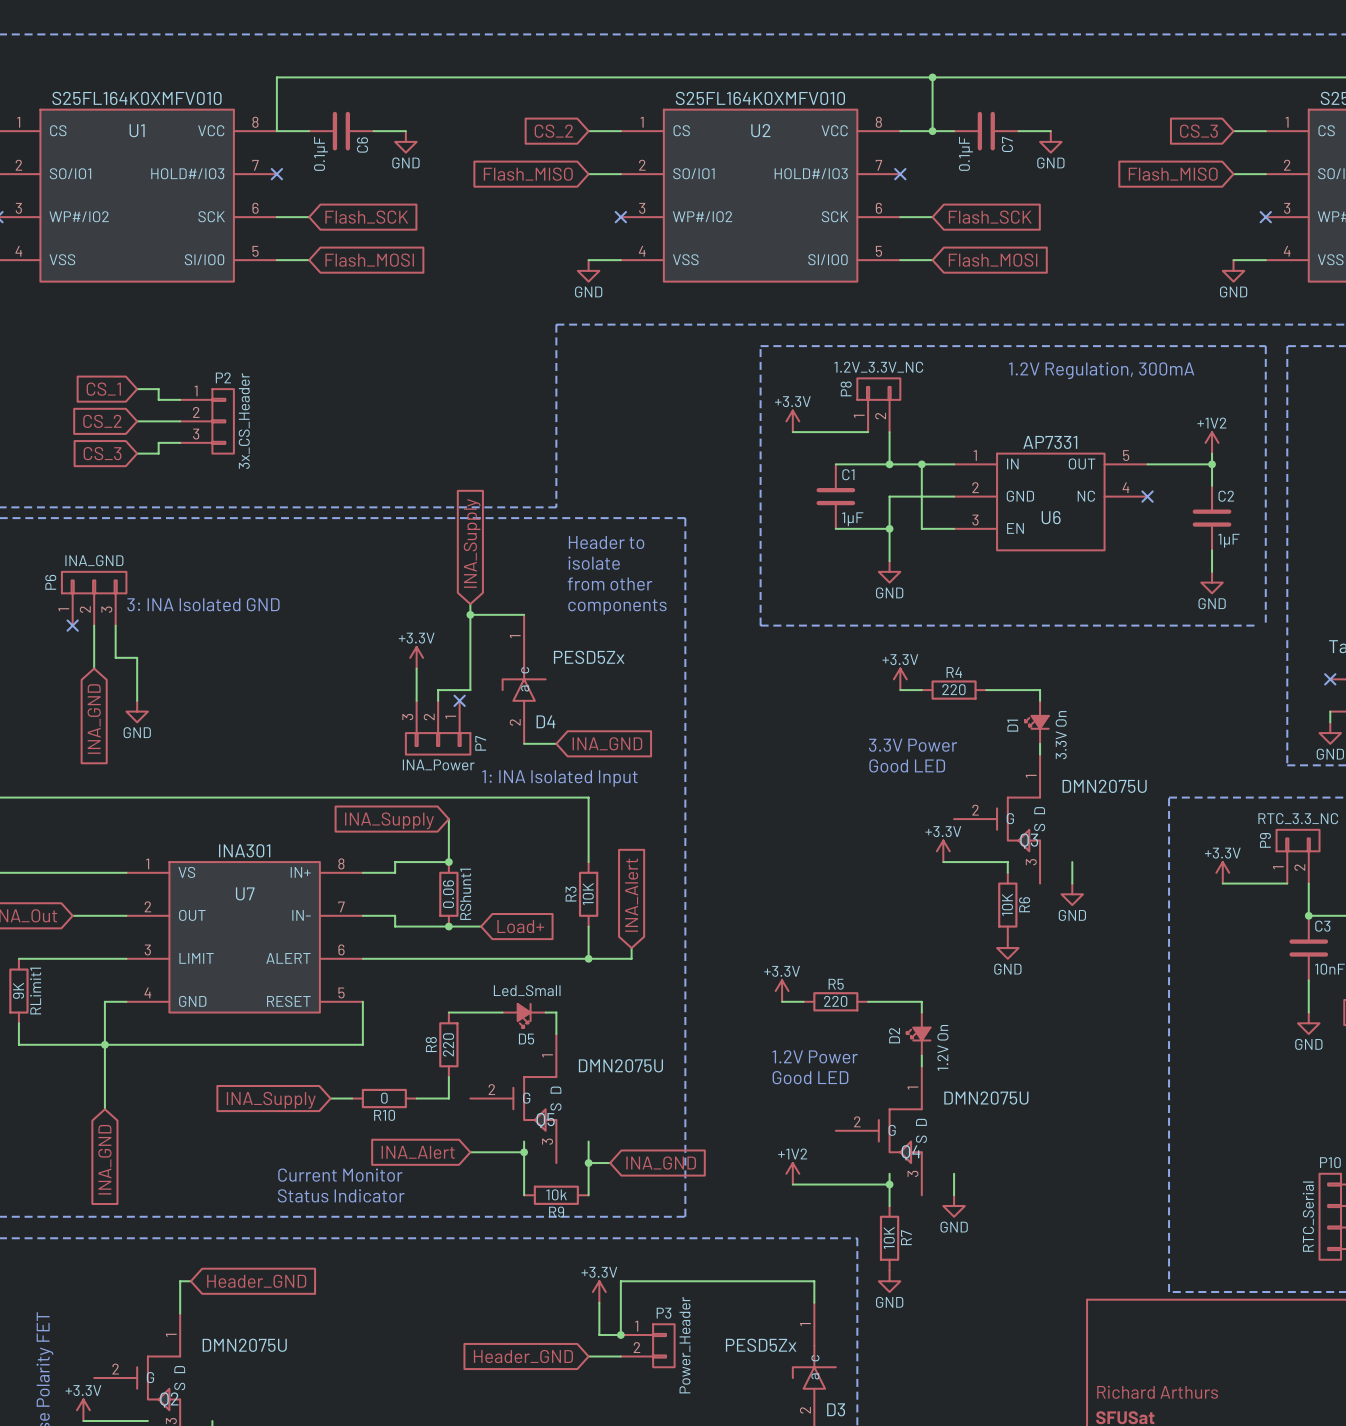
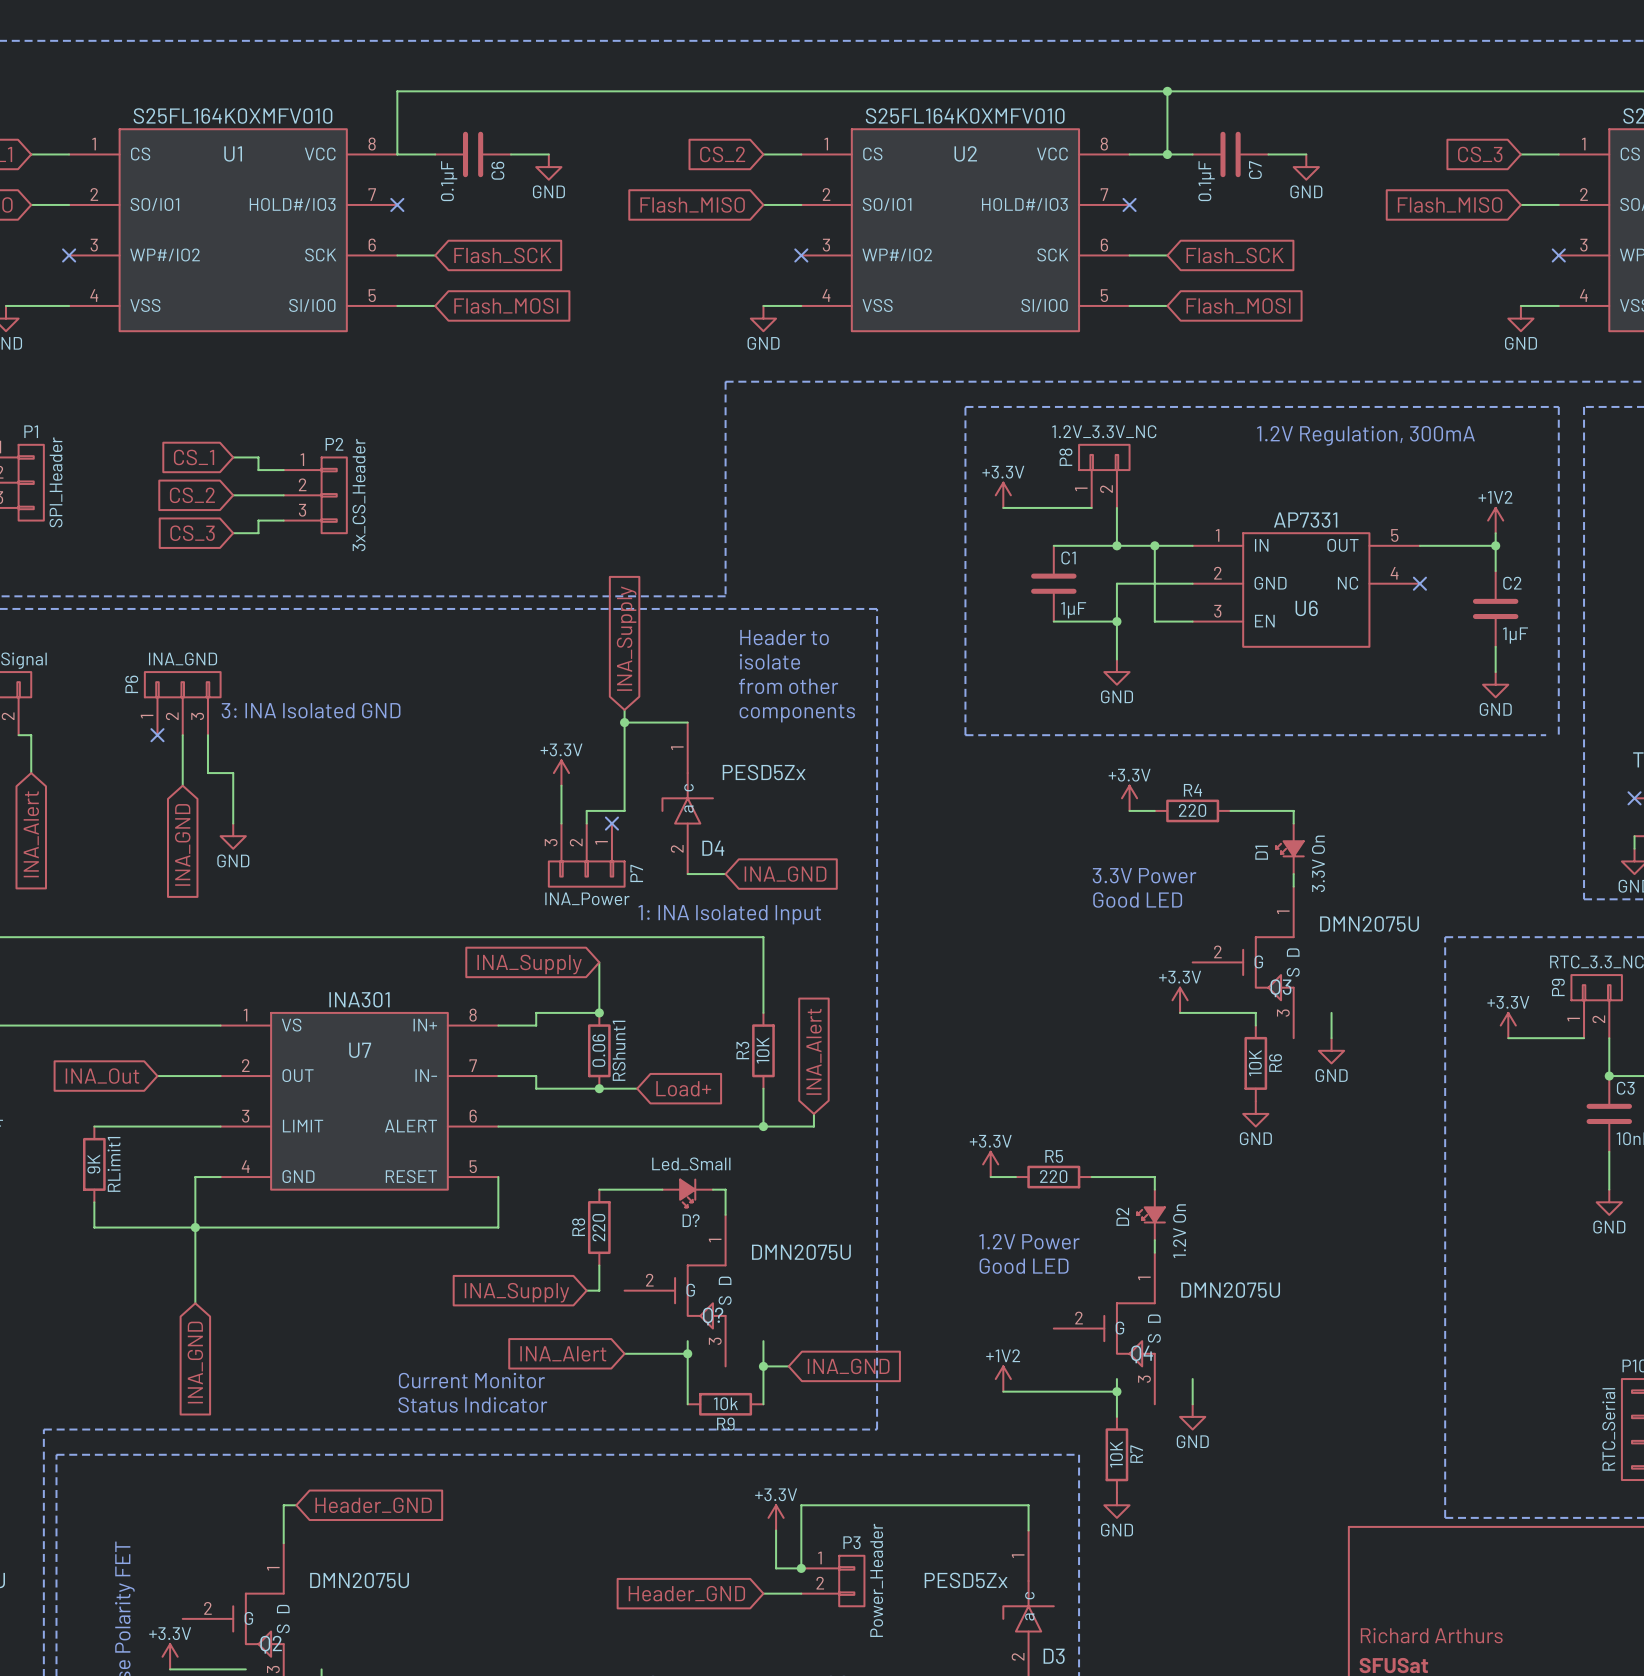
D5 name: D5 (526, 1039) -> D? (691, 1220)
wire: (330, 1098) (352, 1098) -> none
R10: 0 (384, 1098) -> none
wire: (416, 1098) (438, 1098) -> none
global label position: INA_Supply (271, 1100) -> INA_Supply (516, 1292)
Q5 name: Q5 (545, 1120) -> Q? (713, 1316)

